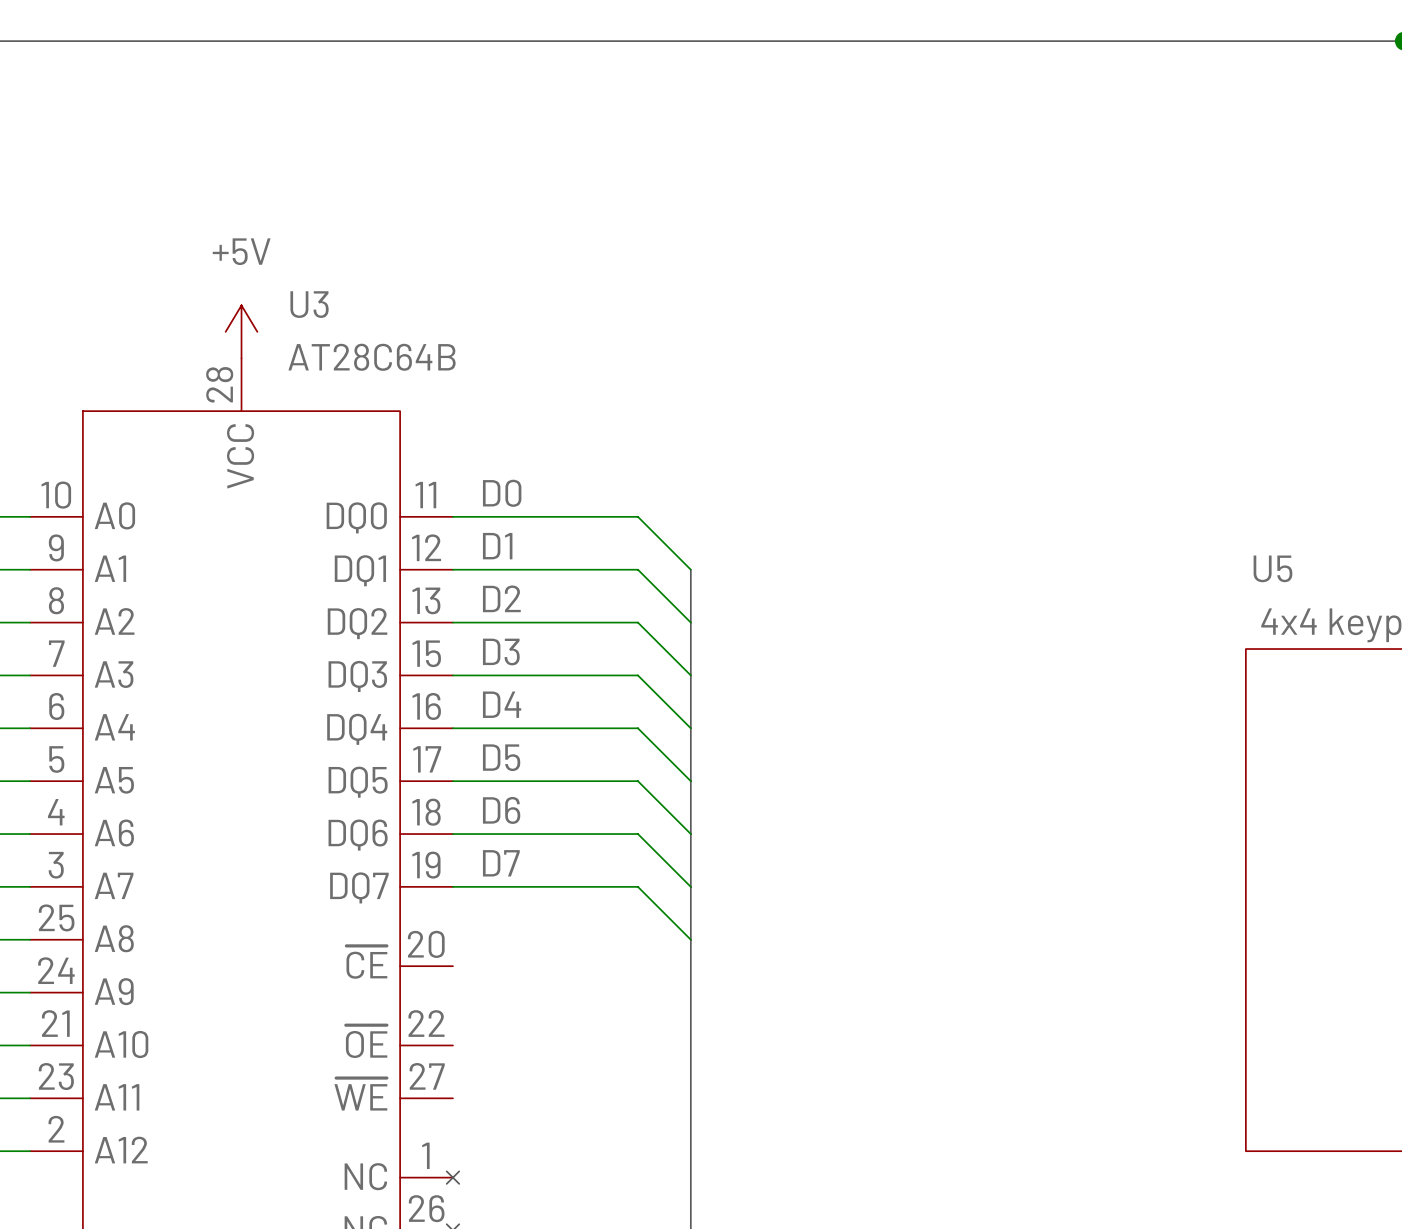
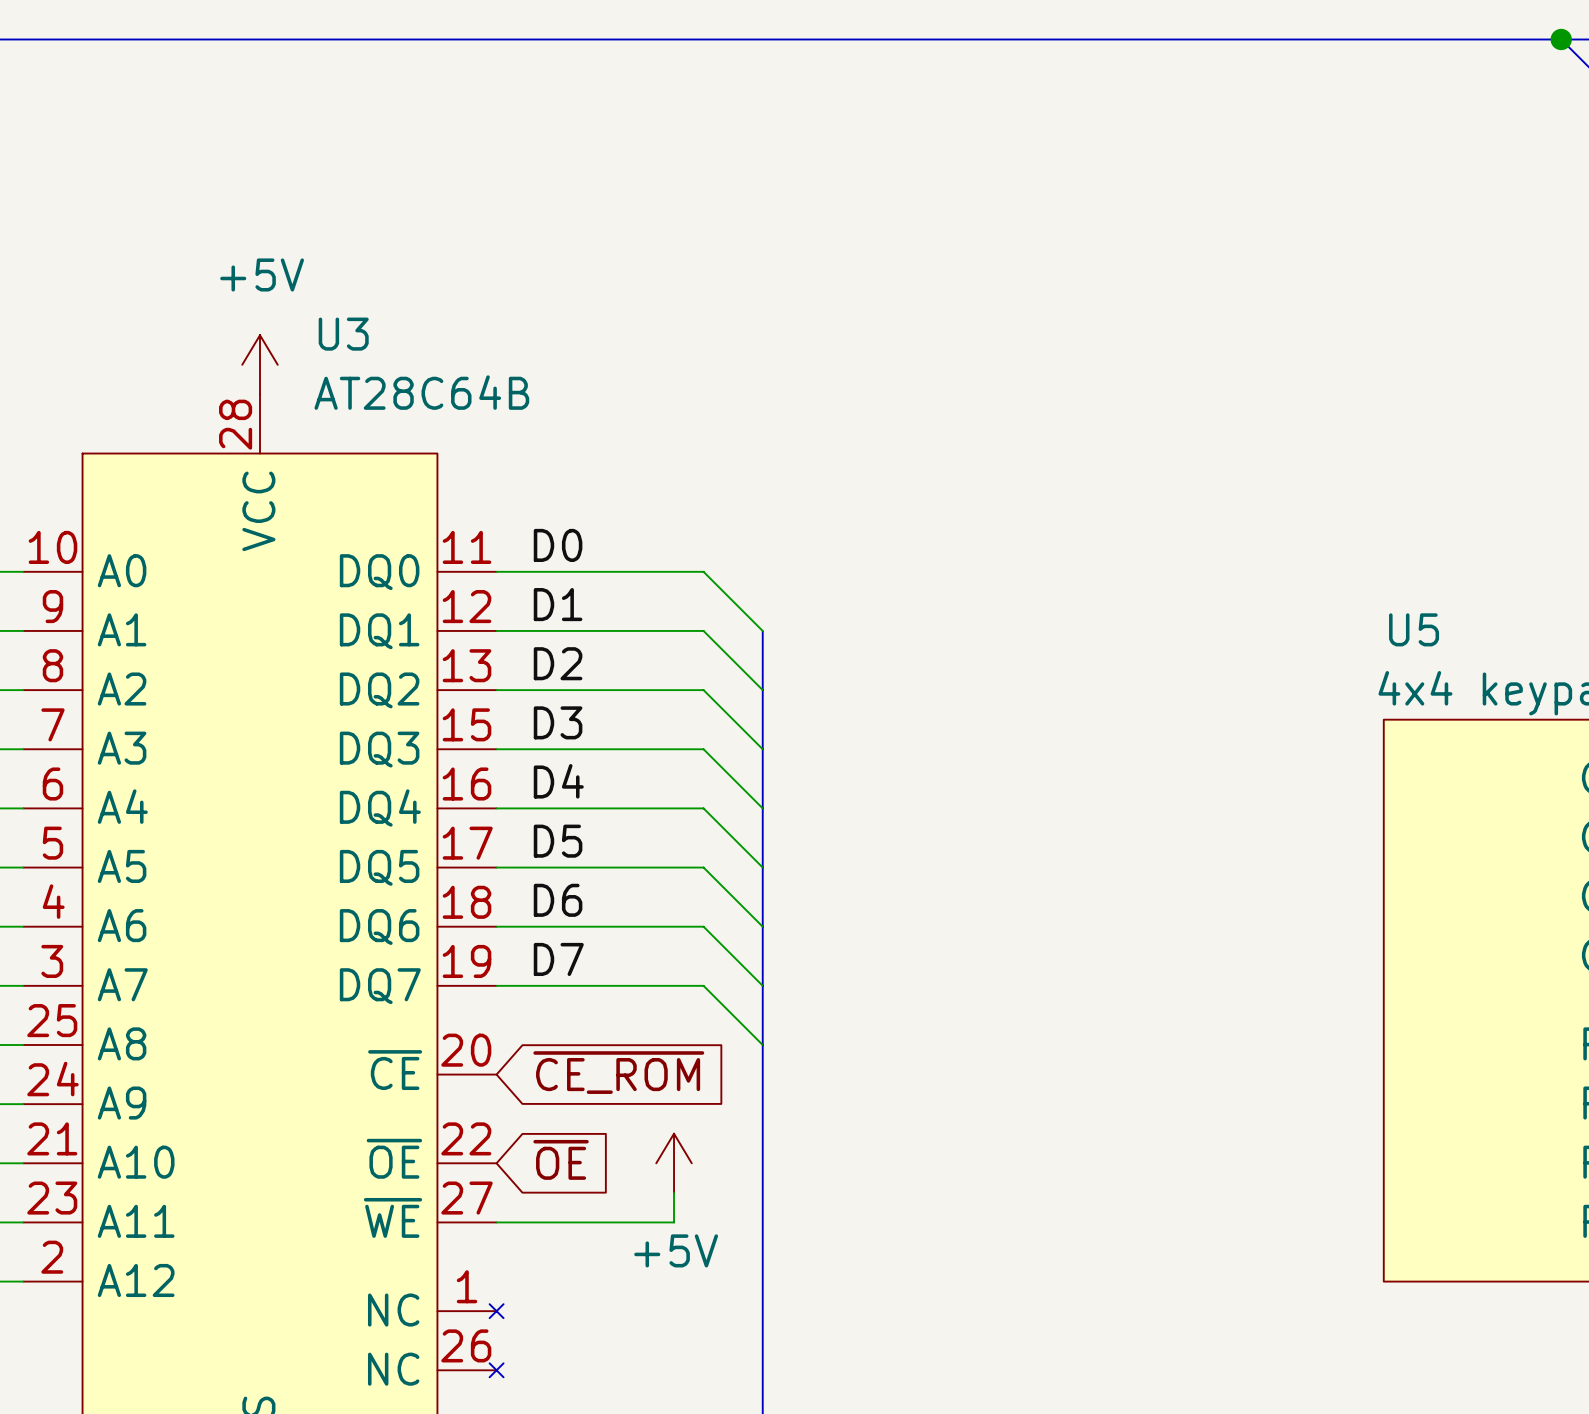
global label: none -> ~{CE_ROM} (618, 1072)
global label: none -> ~{OE} (561, 1159)
power symbol: none -> +5V (674, 1163)
wire: none -> (674, 1192) (674, 1222) (496, 1222)

